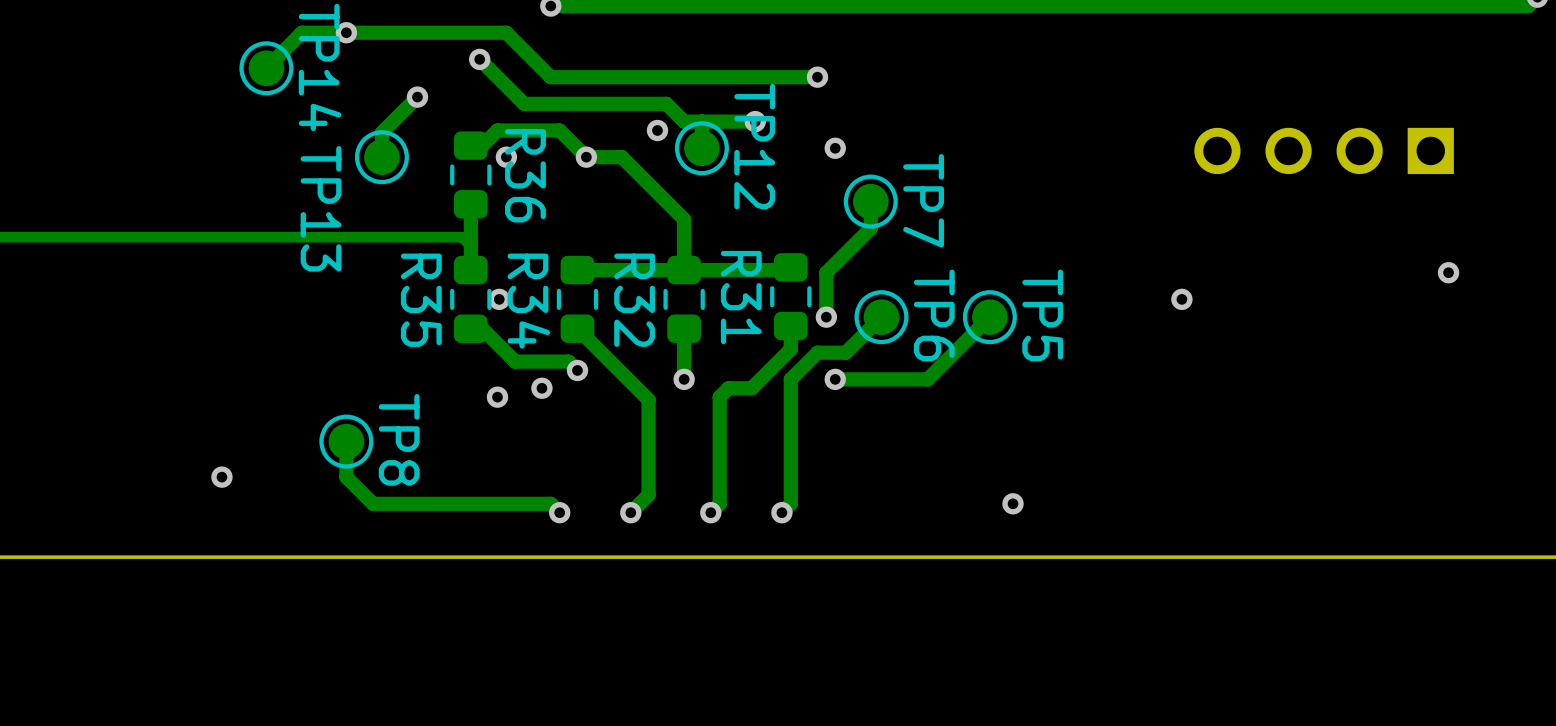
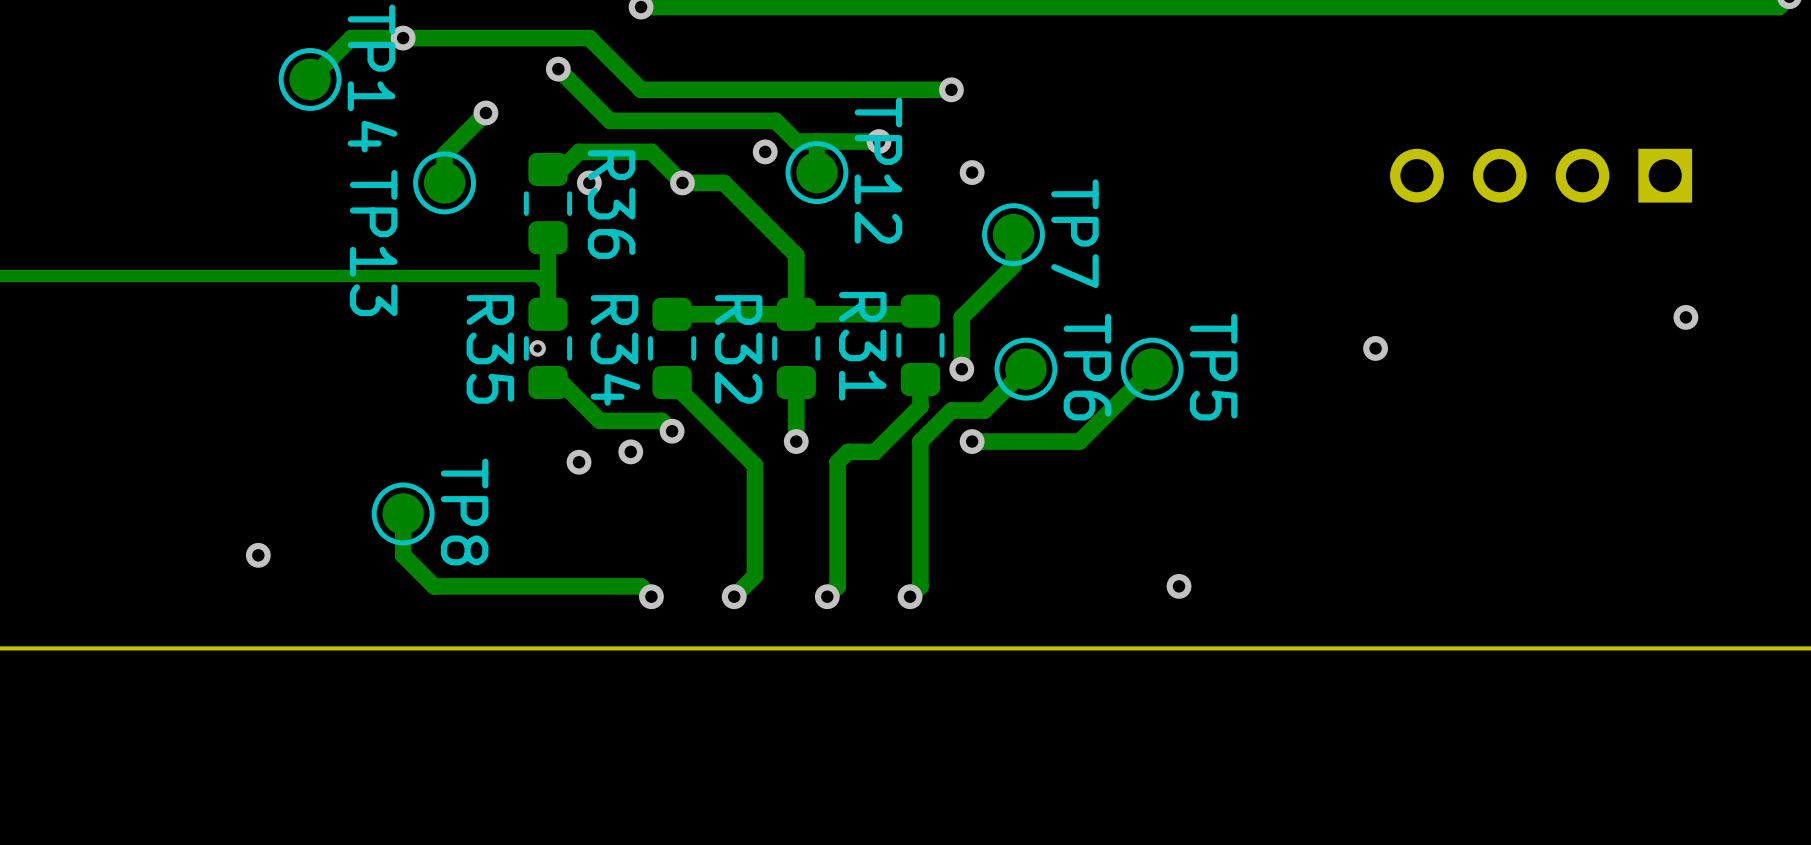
via: none -> (537, 348)
via: (499, 299) -> none

